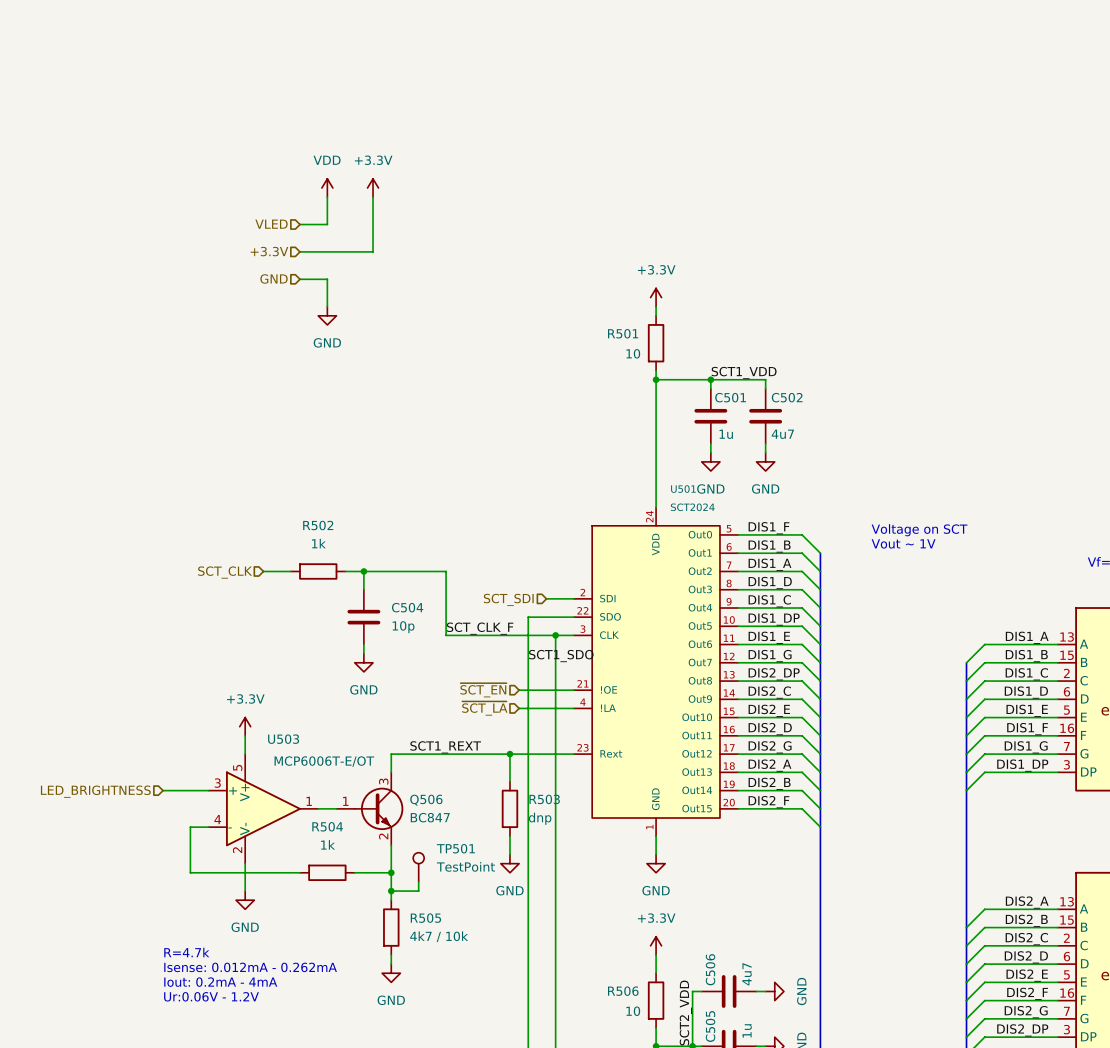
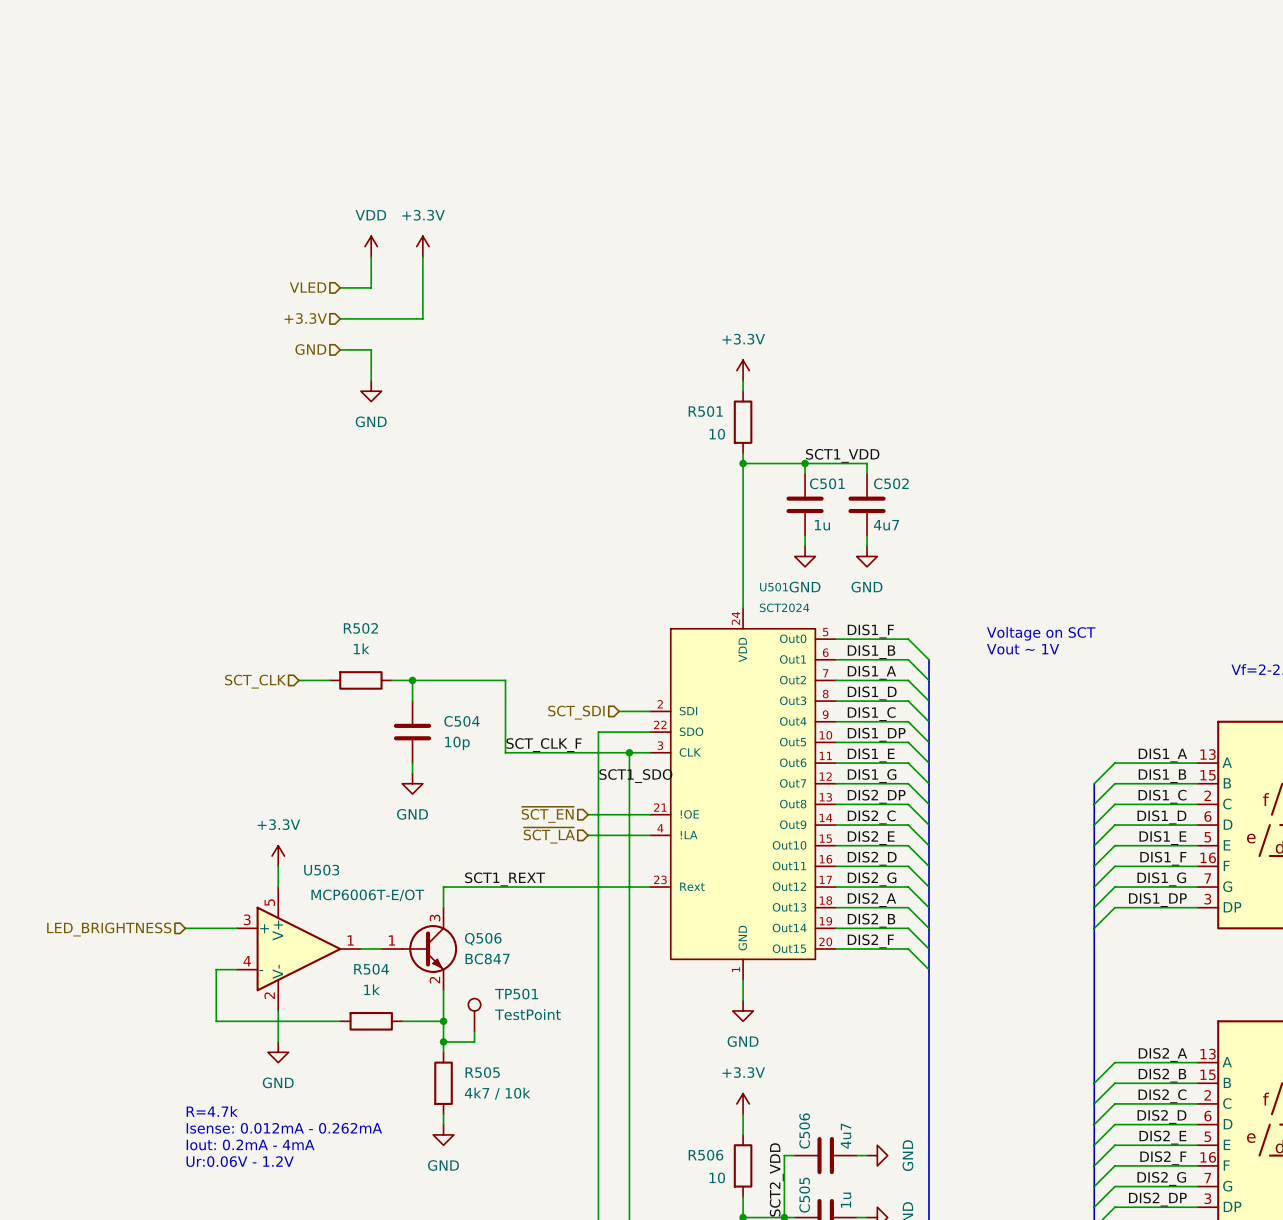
wire: (509, 754) (509, 781) -> none
junction: (509, 754) -> none
R503: dnp (509, 808) -> none
wire: (509, 836) (509, 854) -> none
power symbol: GND (509, 863) -> none

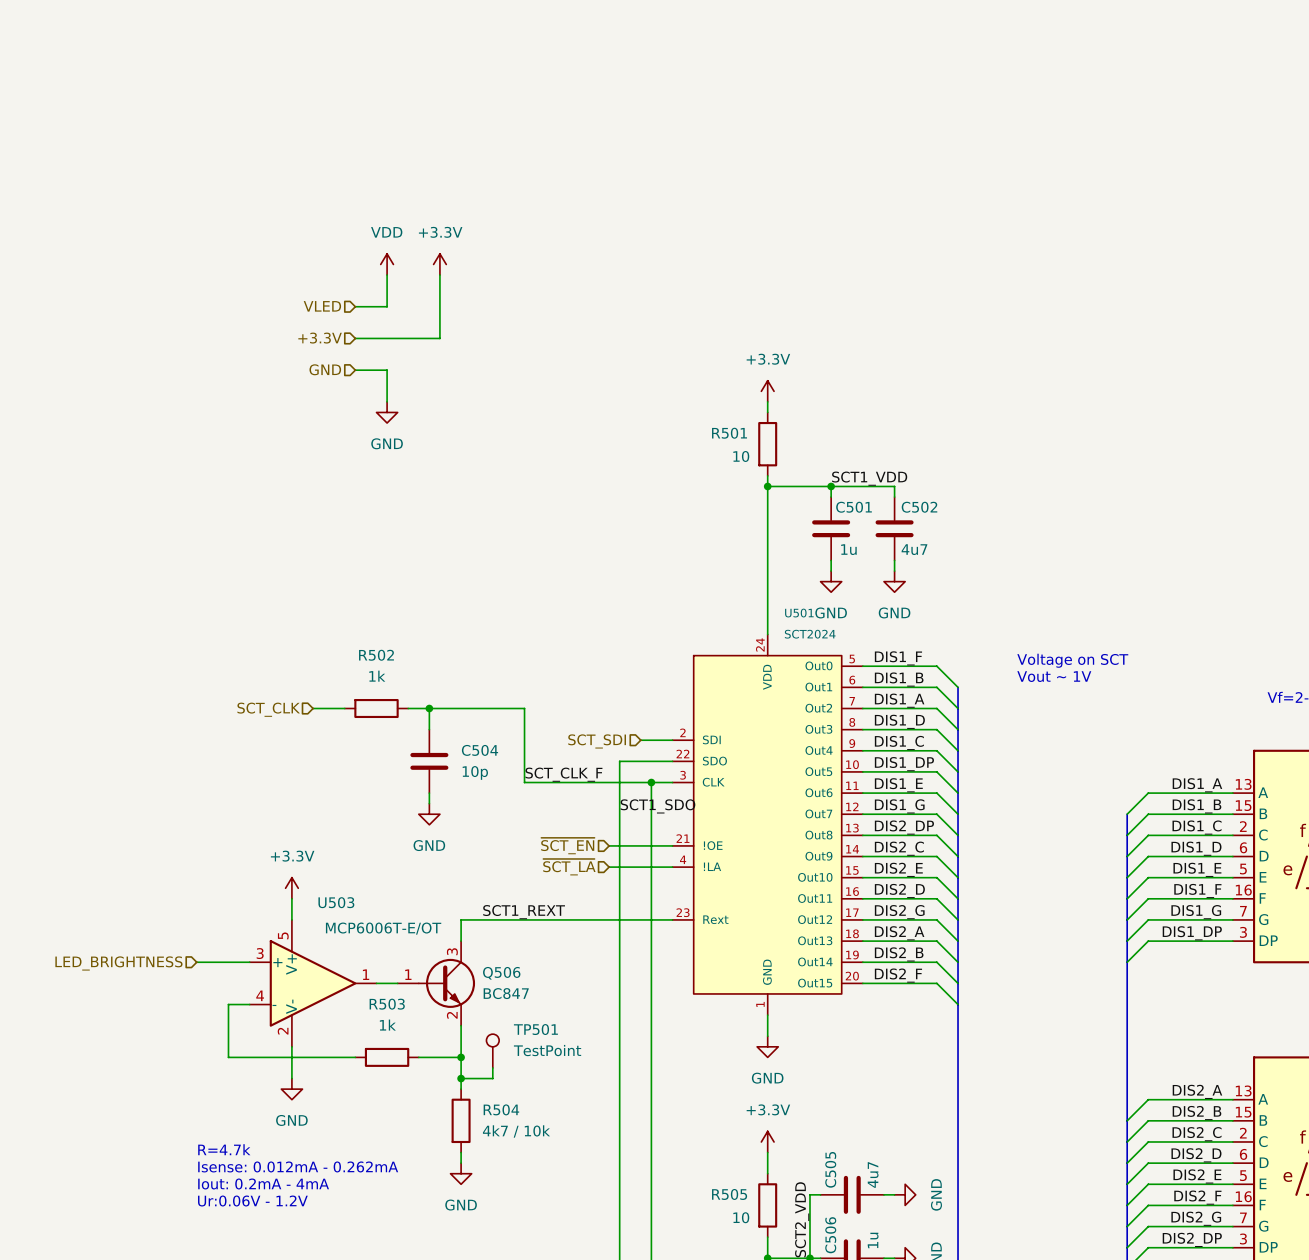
R504 name: R504 (371, 969) -> R503 (387, 1004)
R505 name: R505 (482, 1072) -> R504 (501, 1109)
C506 name: C506 (804, 1130) -> C505 (830, 1169)
R506 name: R506 (705, 1155) -> R505 (729, 1194)
C505 name: C505 (804, 1195) -> C506 (830, 1235)

